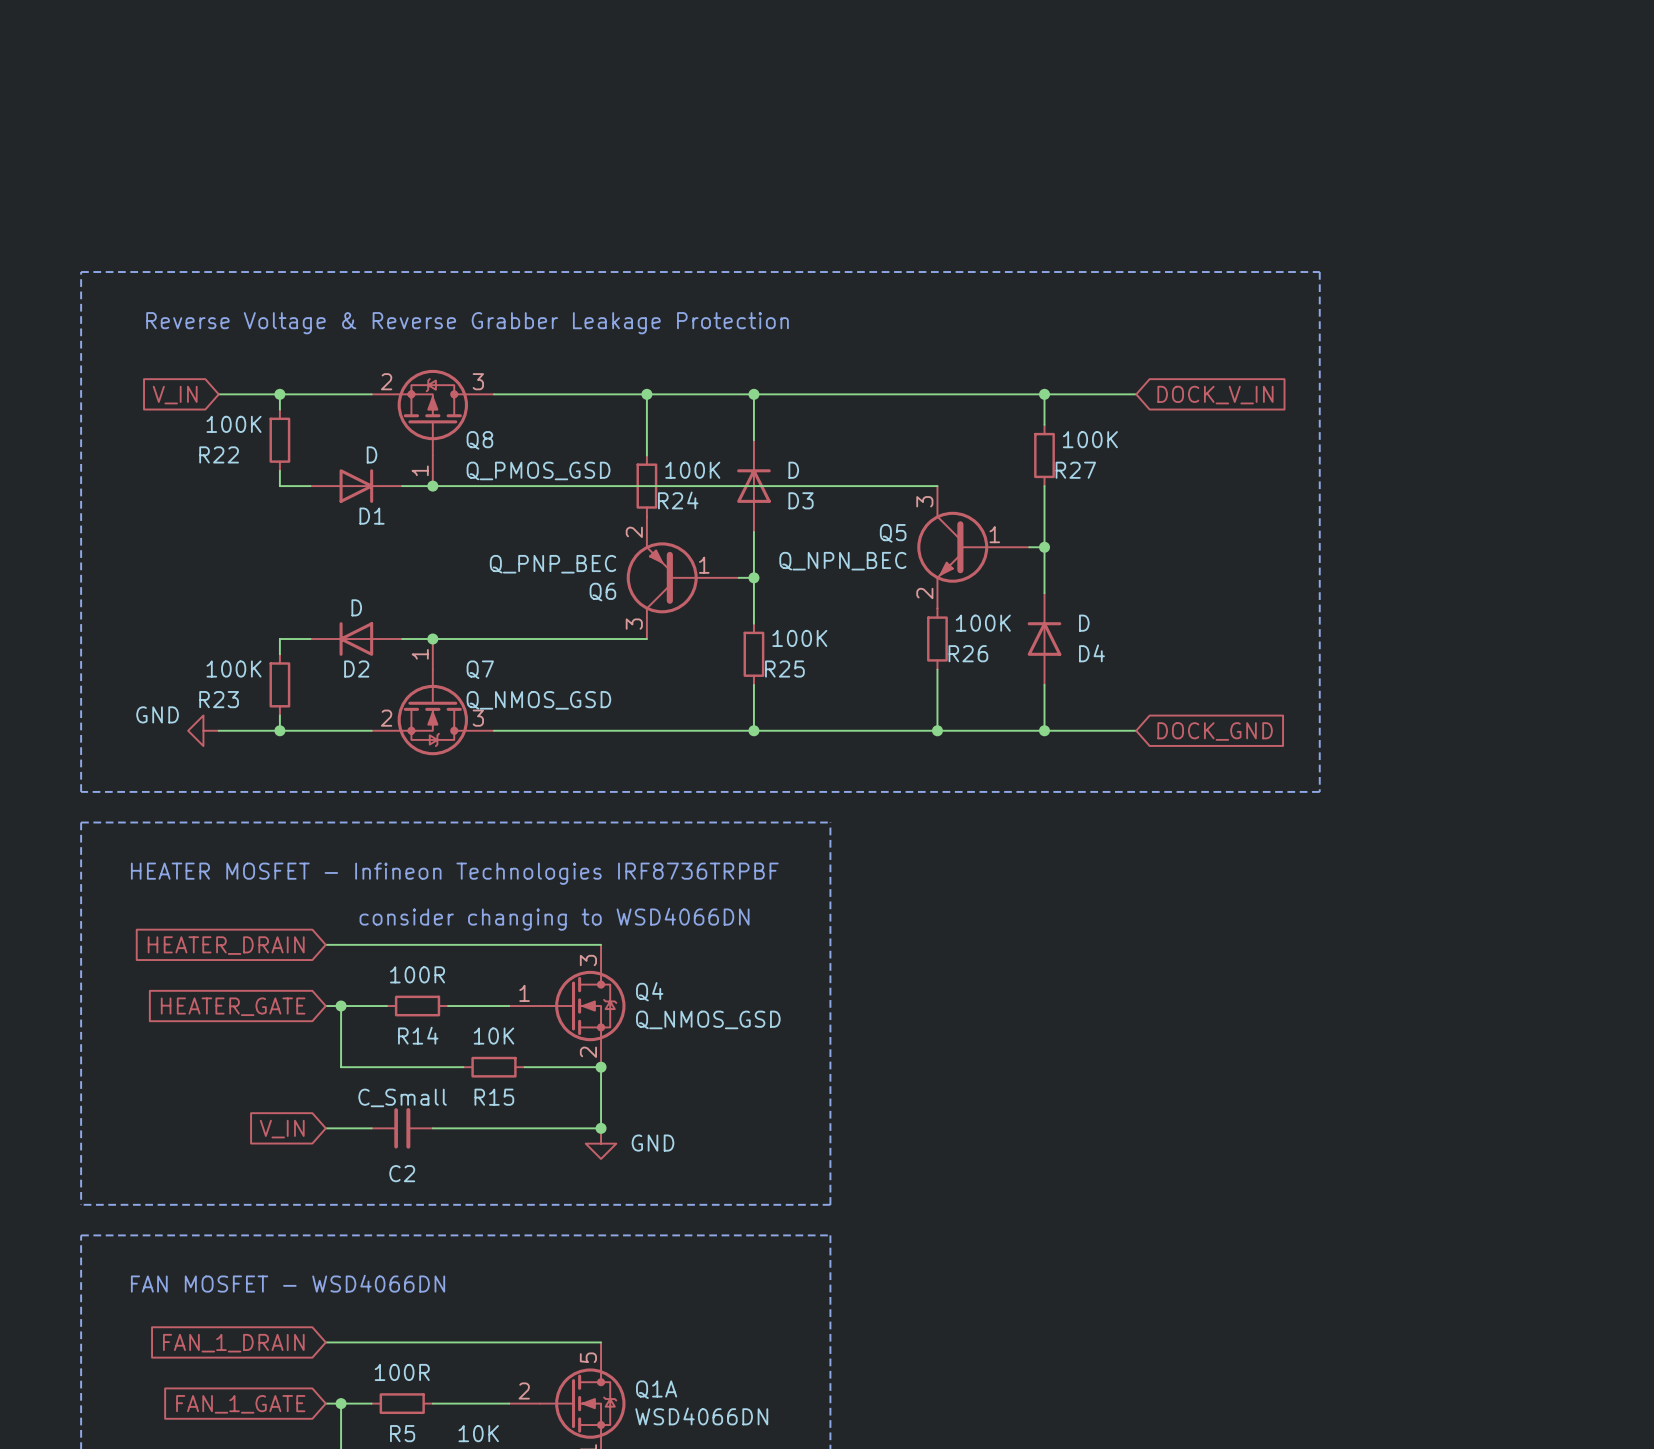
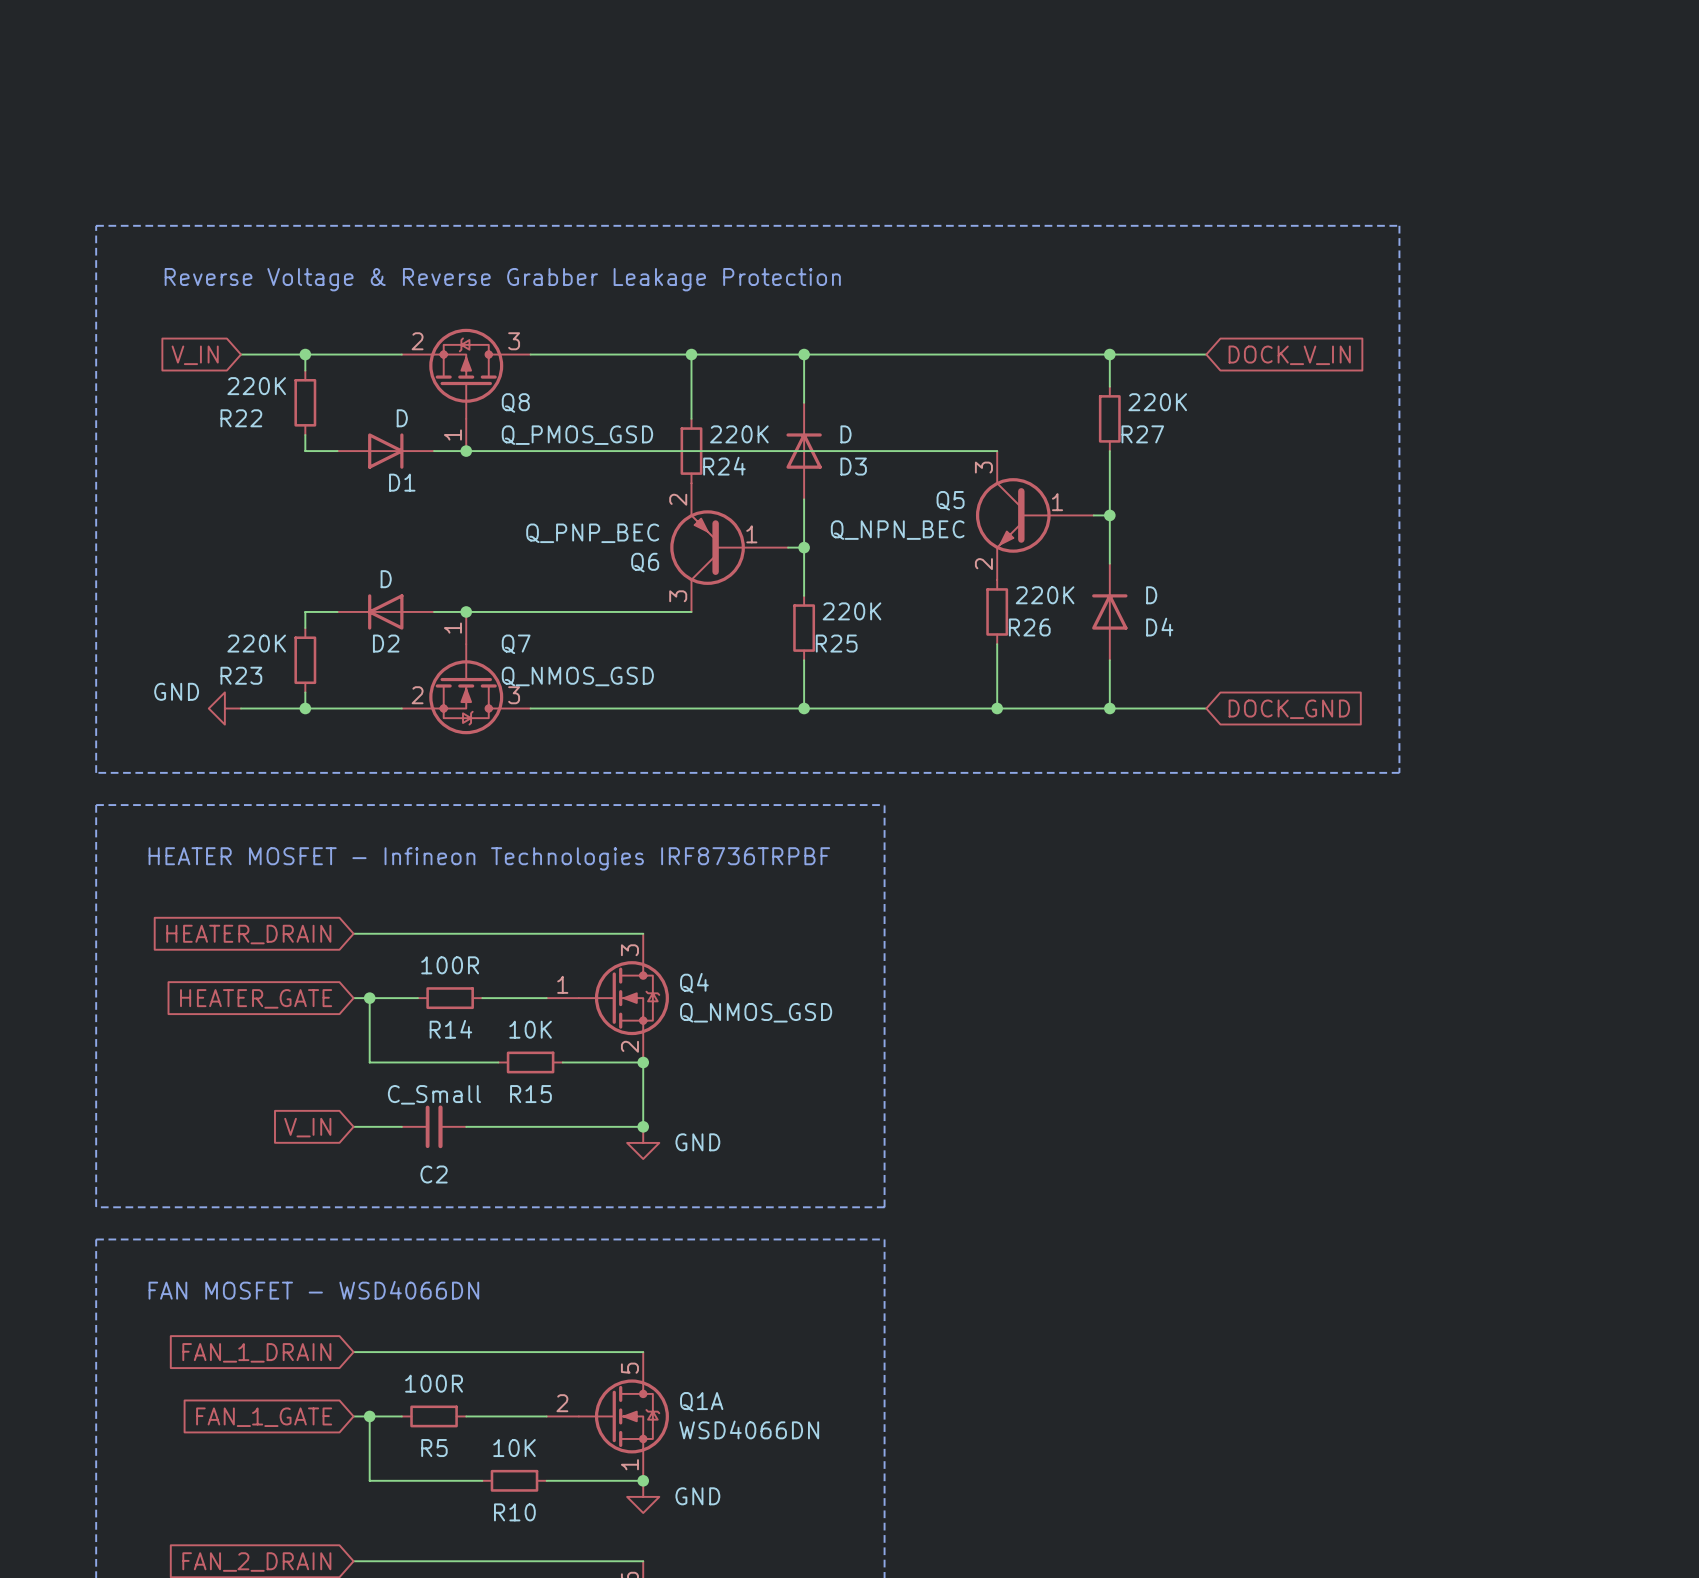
R22 value: 100K (234, 424) -> 220K (256, 386)
R27 value: 100K (1090, 439) -> 220K (1157, 402)
R24 value: 100K (692, 470) -> 220K (739, 434)
R26 value: 100K (983, 623) -> 220K (1045, 595)
R25 value: 100K (799, 638) -> 220K (852, 611)
R23 value: 100K (234, 669) -> 220K (256, 643)
text: consider changing to WSD4066DN (554, 919) -> none

